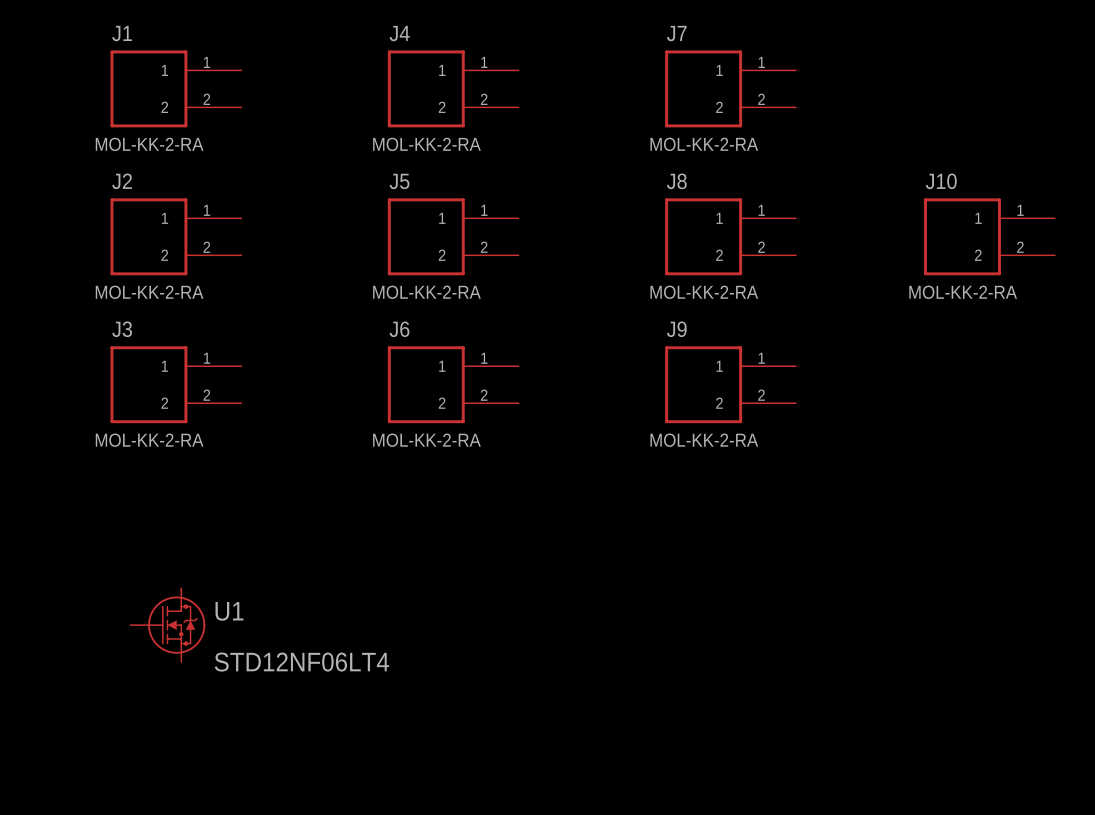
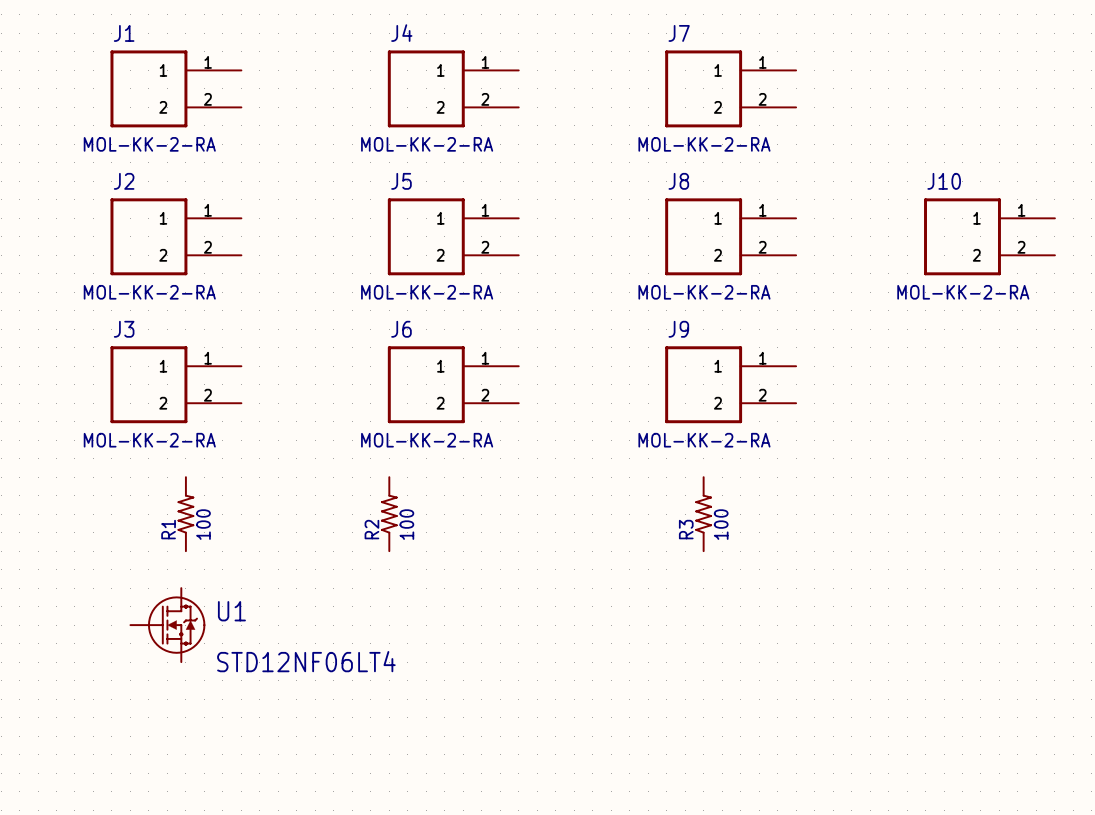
R1: none -> 100 (185, 514)
R2: none -> 100 (389, 514)
R3: none -> 100 (703, 514)

